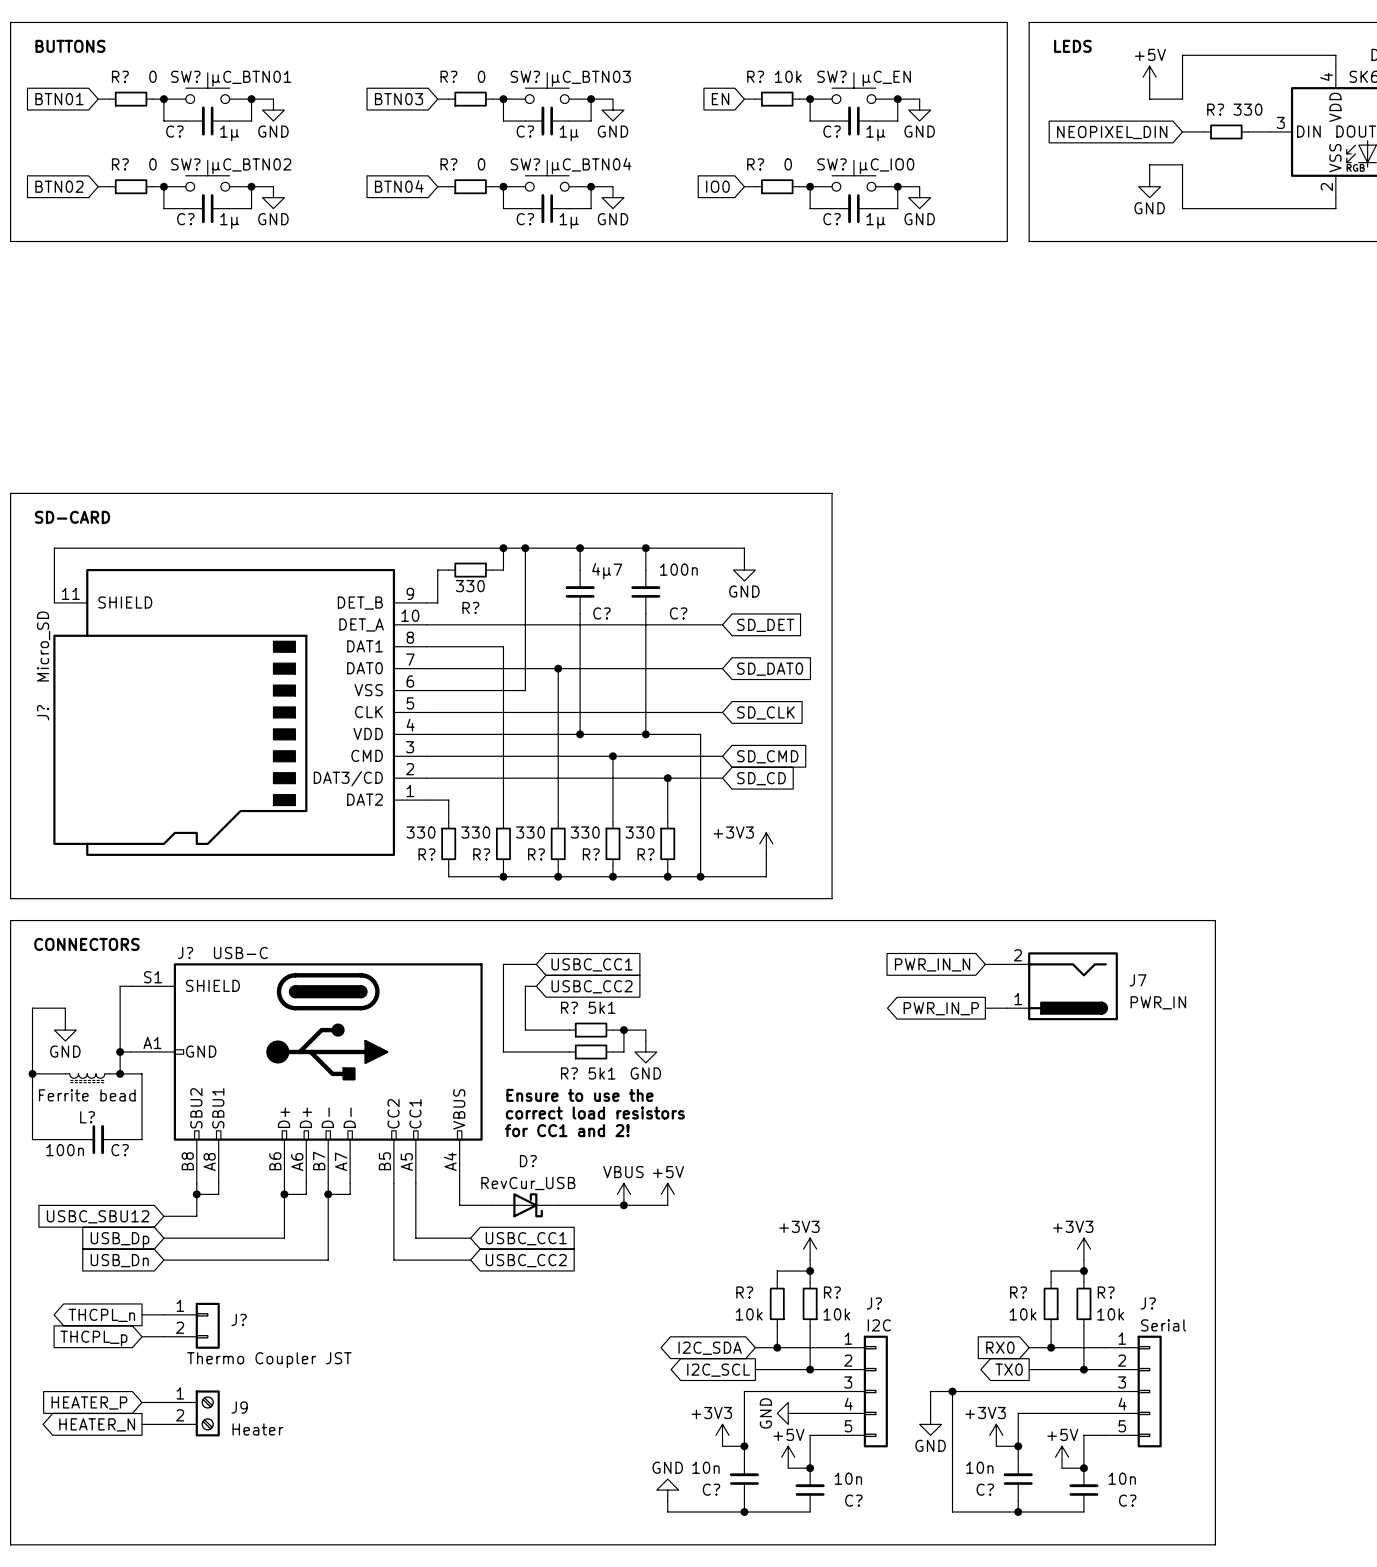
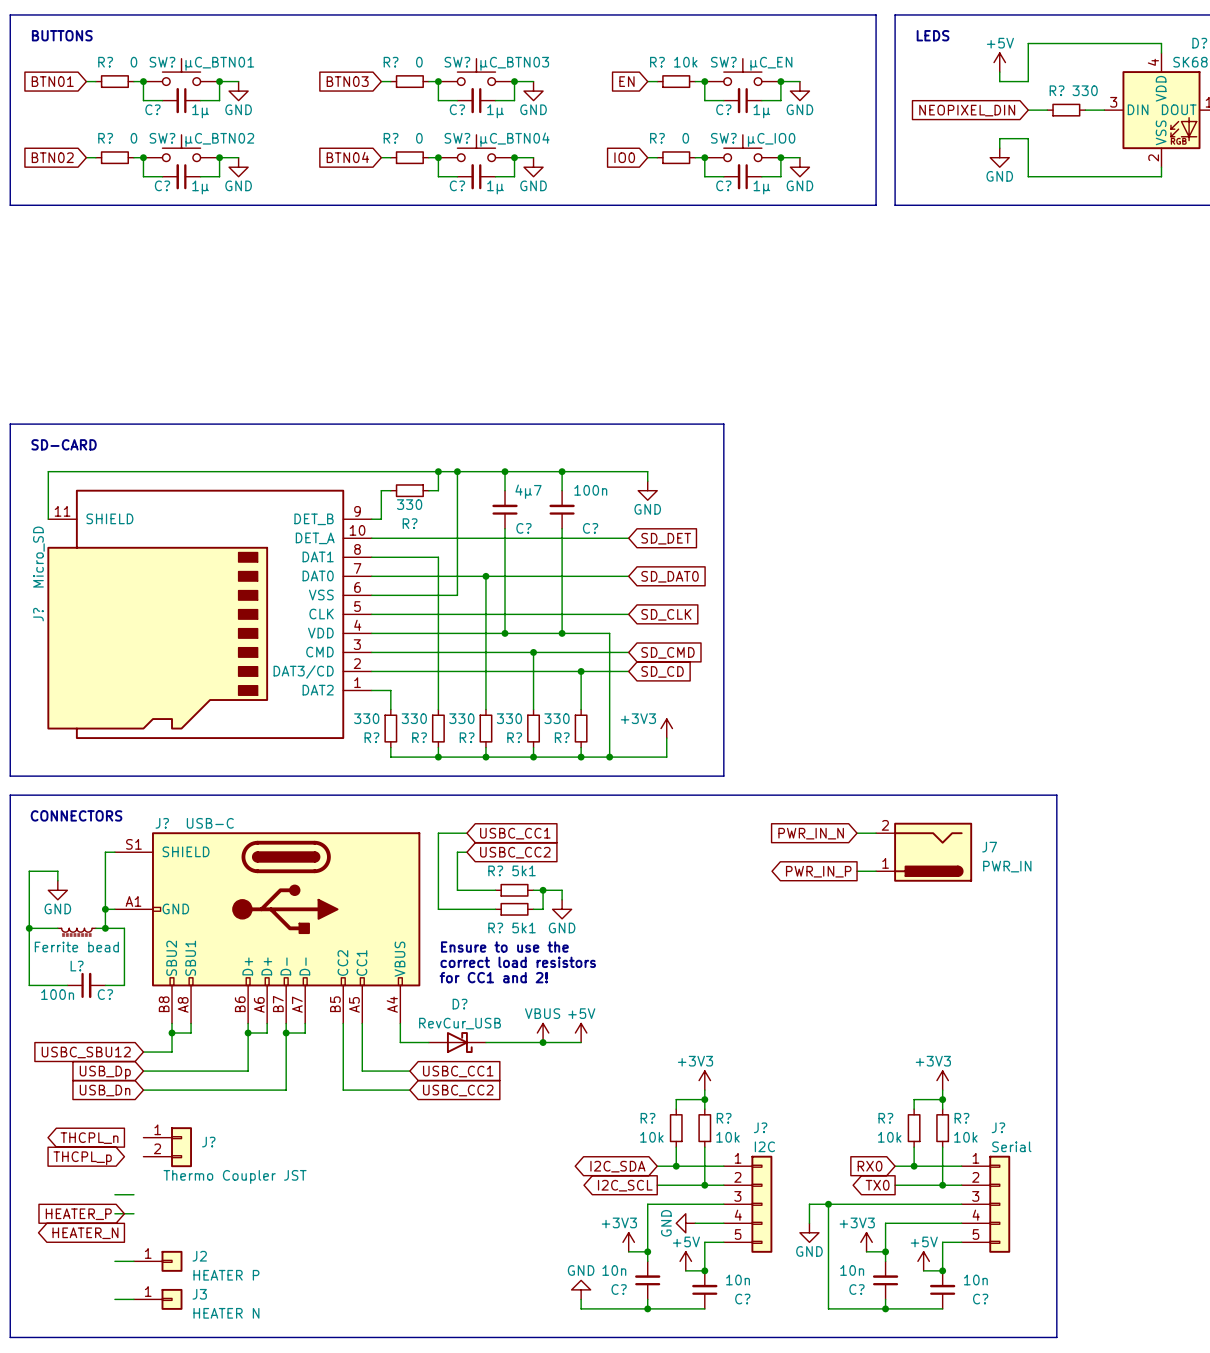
wire: (142, 1314) (163, 1314) -> (114, 1299) (133, 1299)
wire: (142, 1336) (163, 1336) -> (114, 1194) (133, 1194)
wire: (152, 1402) (163, 1402) -> (114, 1213) (124, 1213)
J9: Heater (191, 1413) -> none
wire: (142, 1424) (163, 1424) -> (114, 1261) (133, 1261)
J2: none -> HEATER P (158, 1261)
J3: none -> HEATER N (158, 1299)

